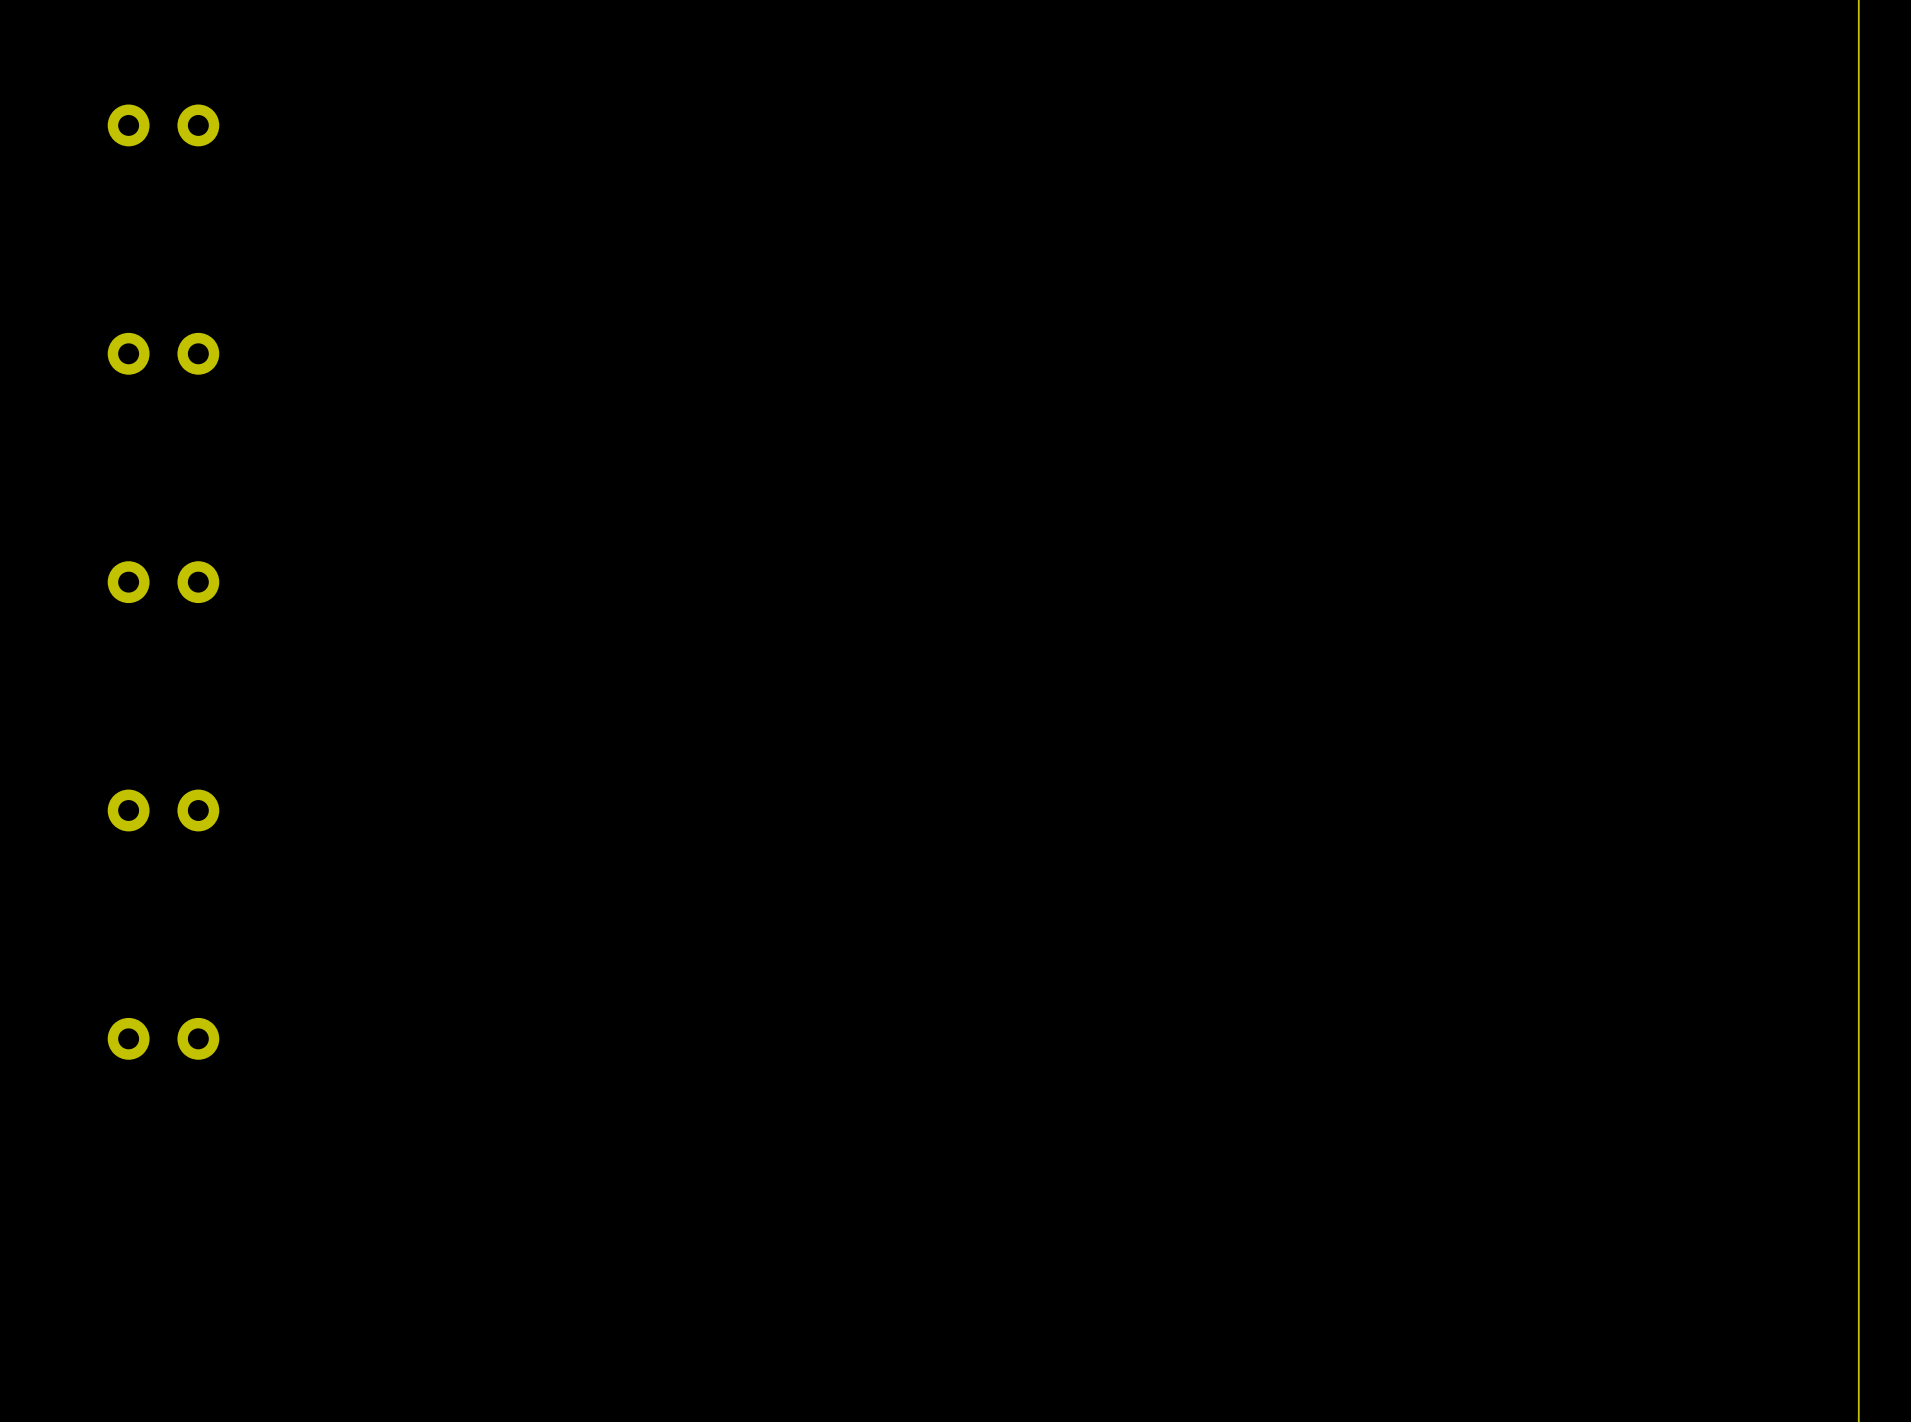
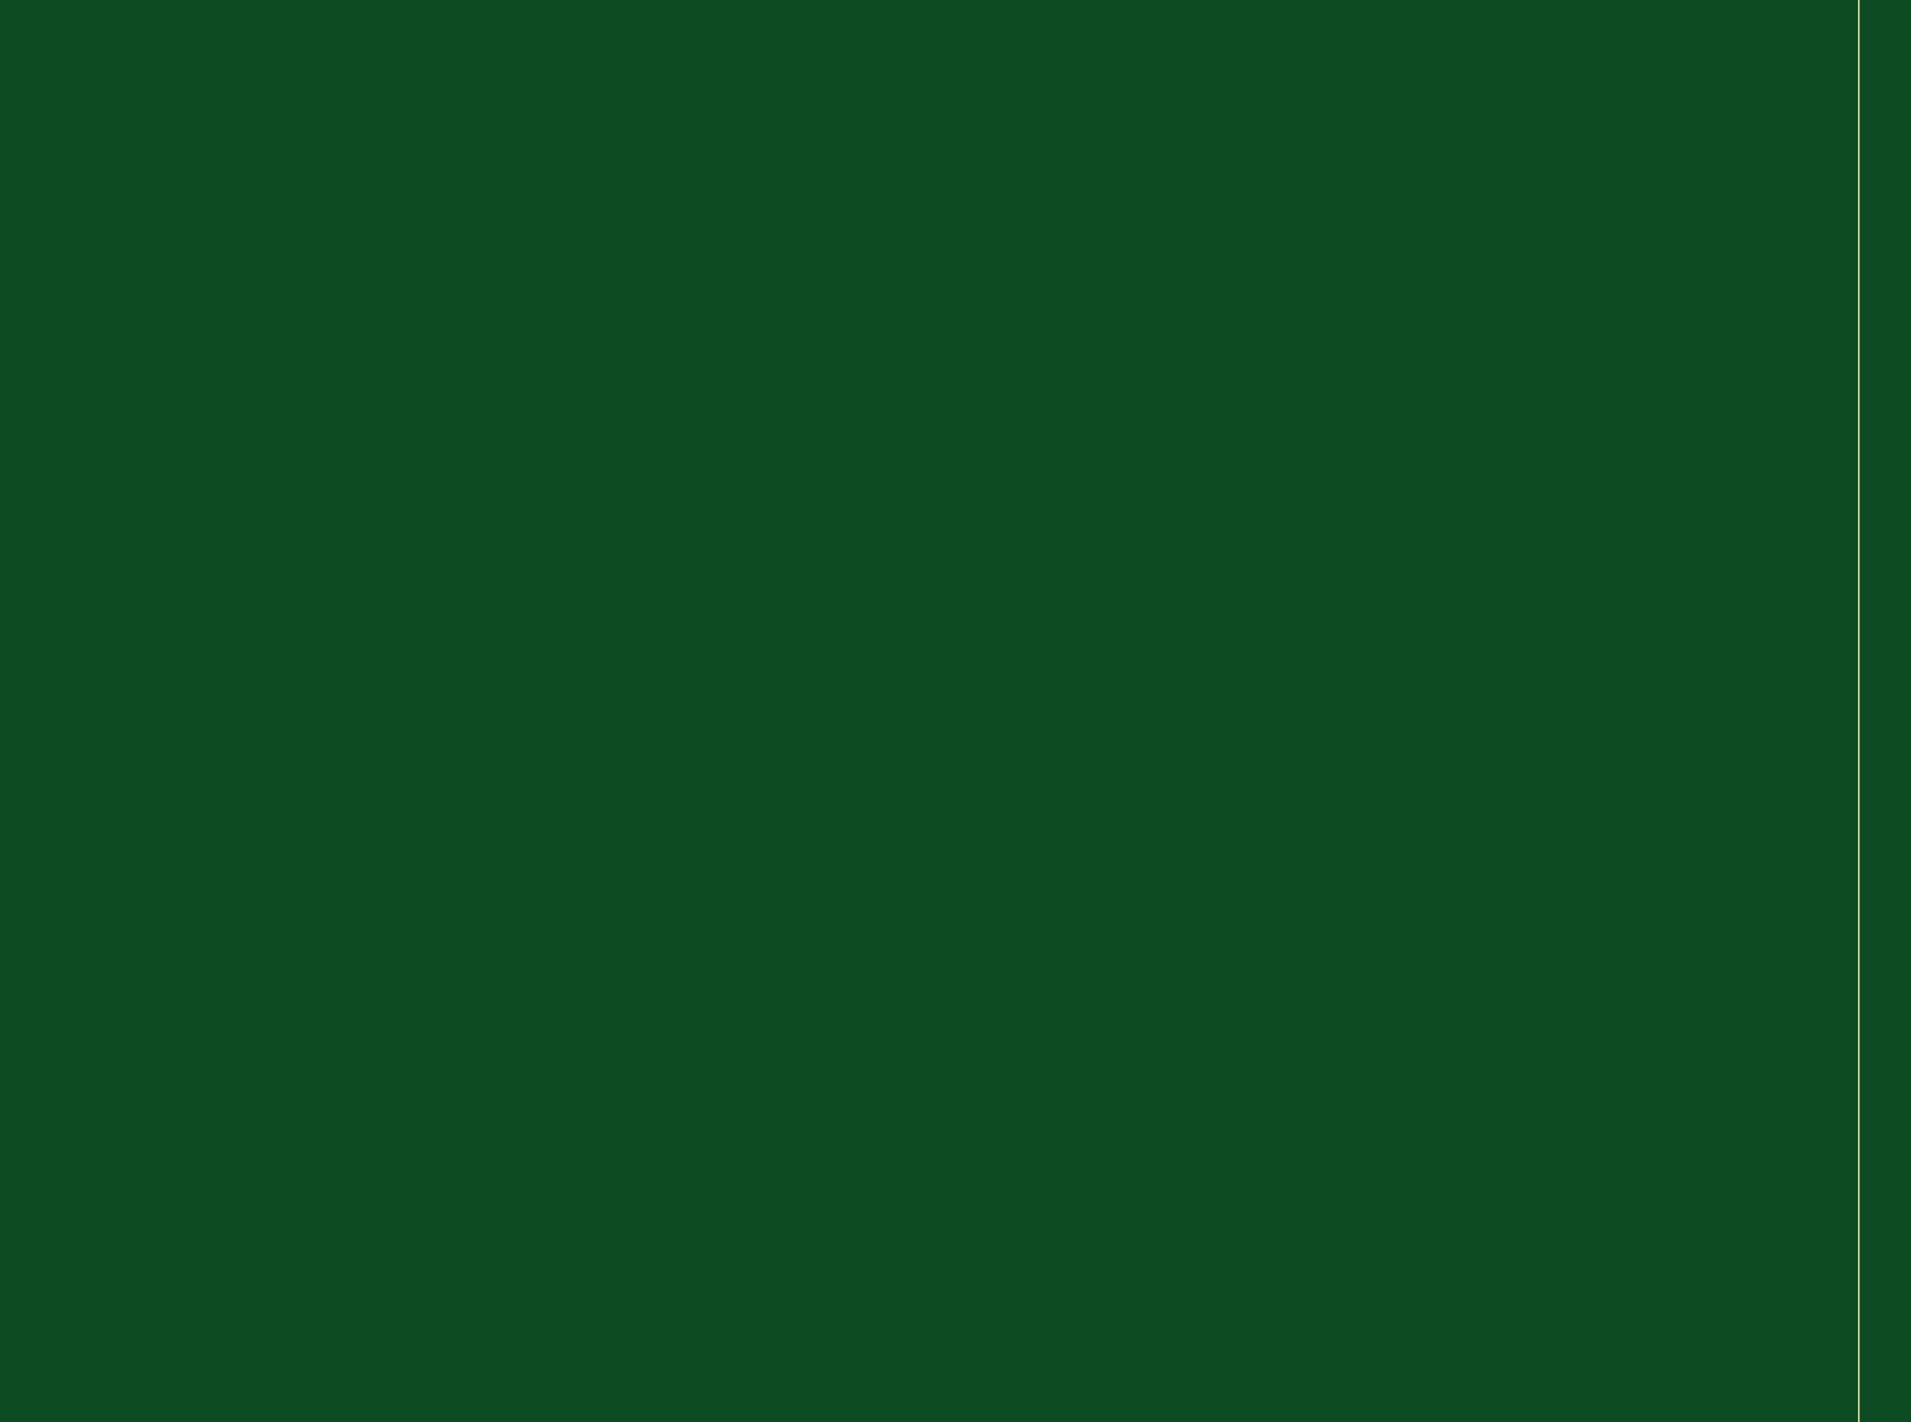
part: (163, 125) -> none
part: (163, 353) -> none
part: (163, 582) -> none
part: (163, 810) -> none
part: (163, 1038) -> none

